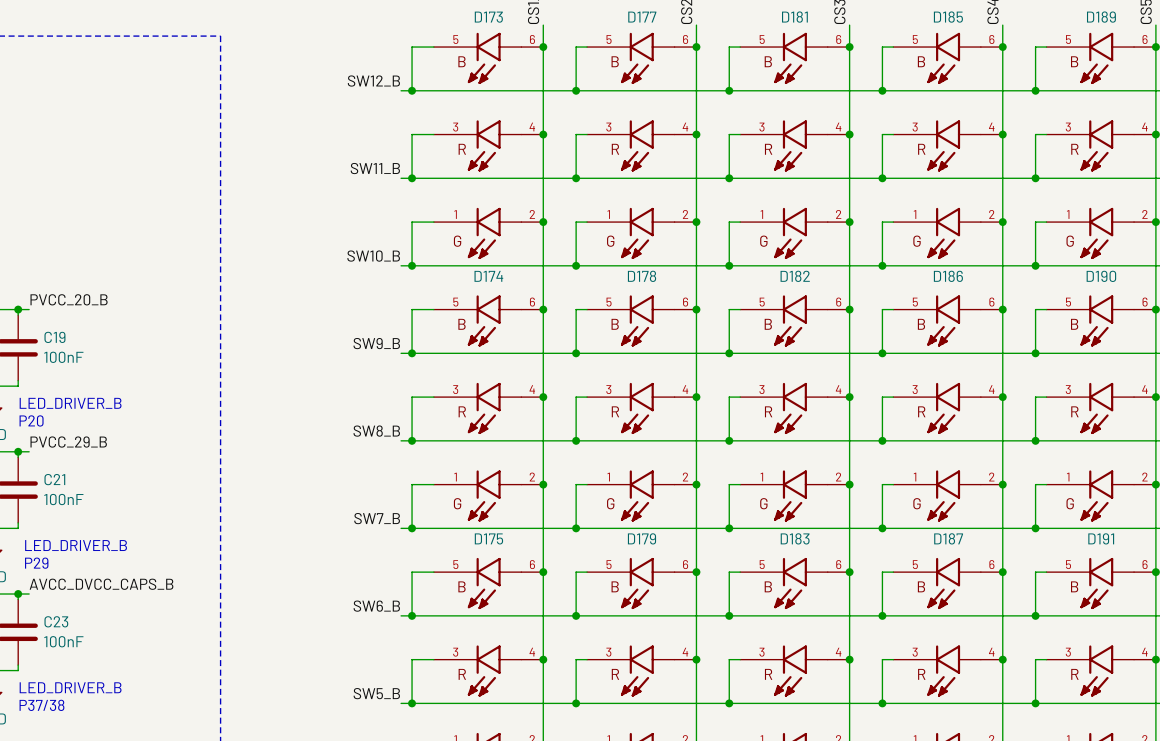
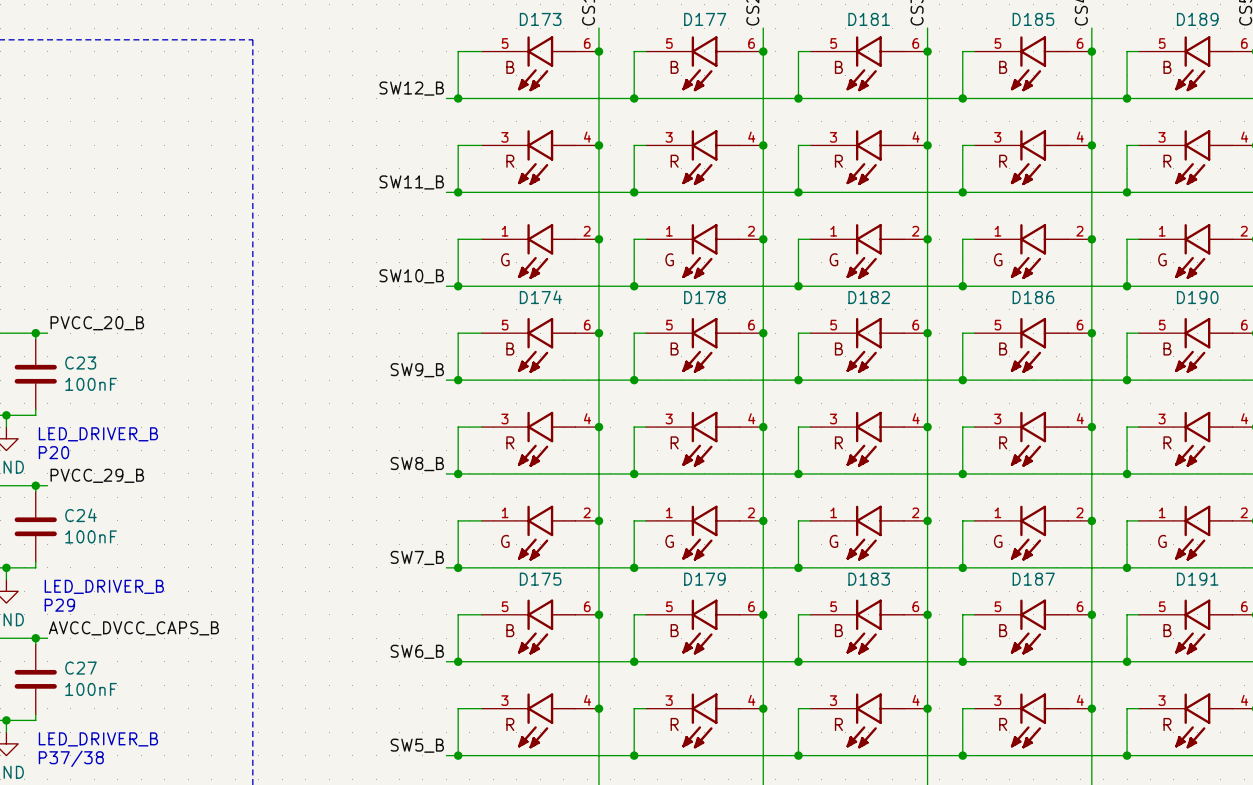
C19 name: C19 (54, 337) -> C23 (80, 363)
C21 name: C21 (54, 479) -> C24 (80, 515)
C23 name: C23 (56, 621) -> C27 (80, 668)

